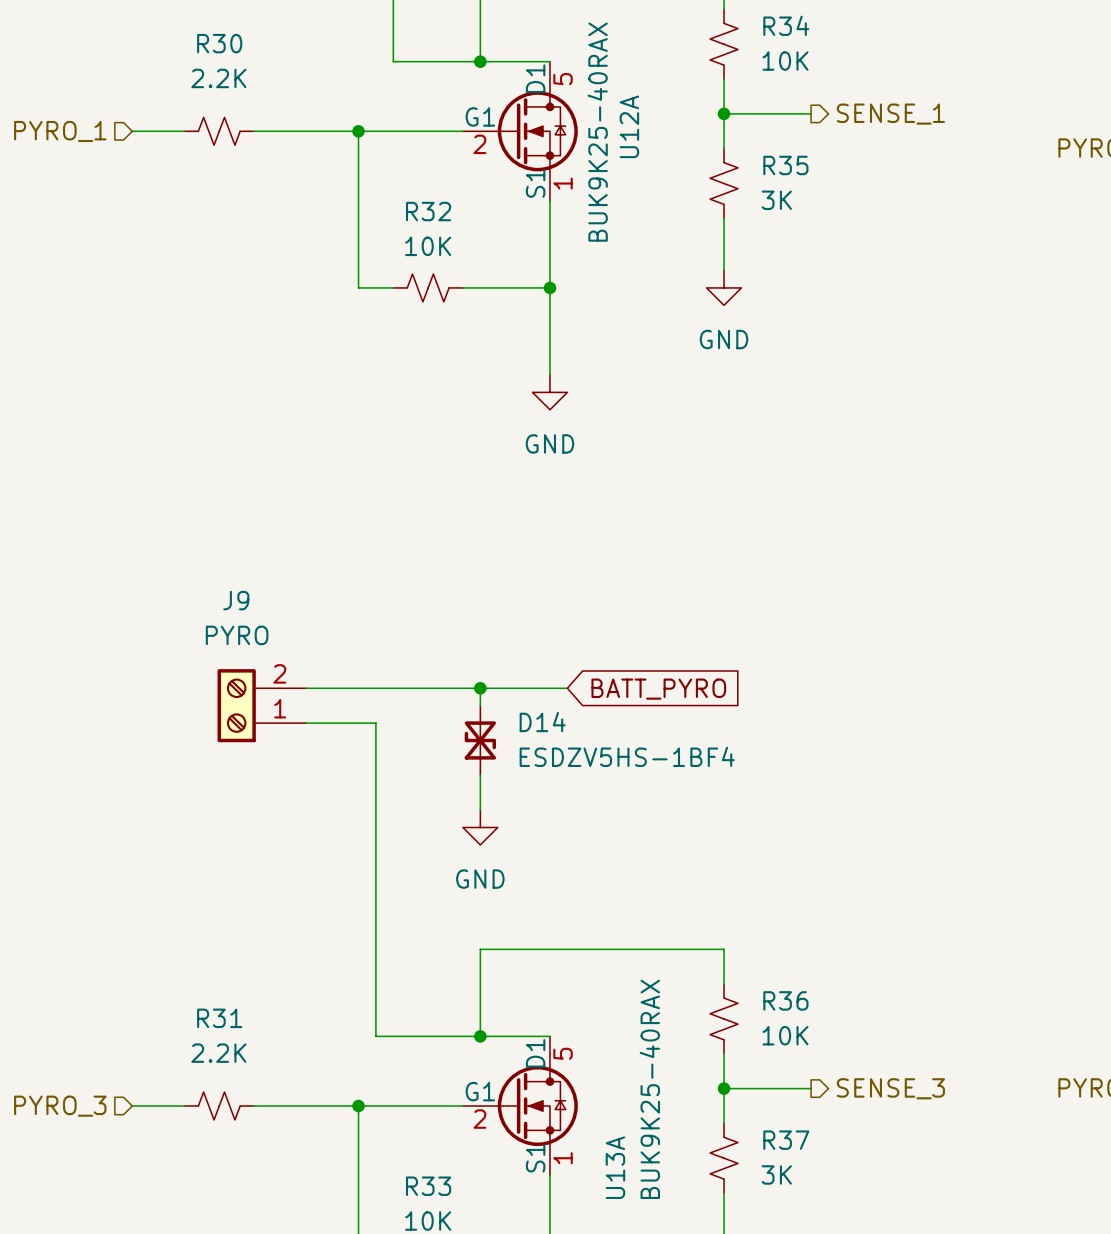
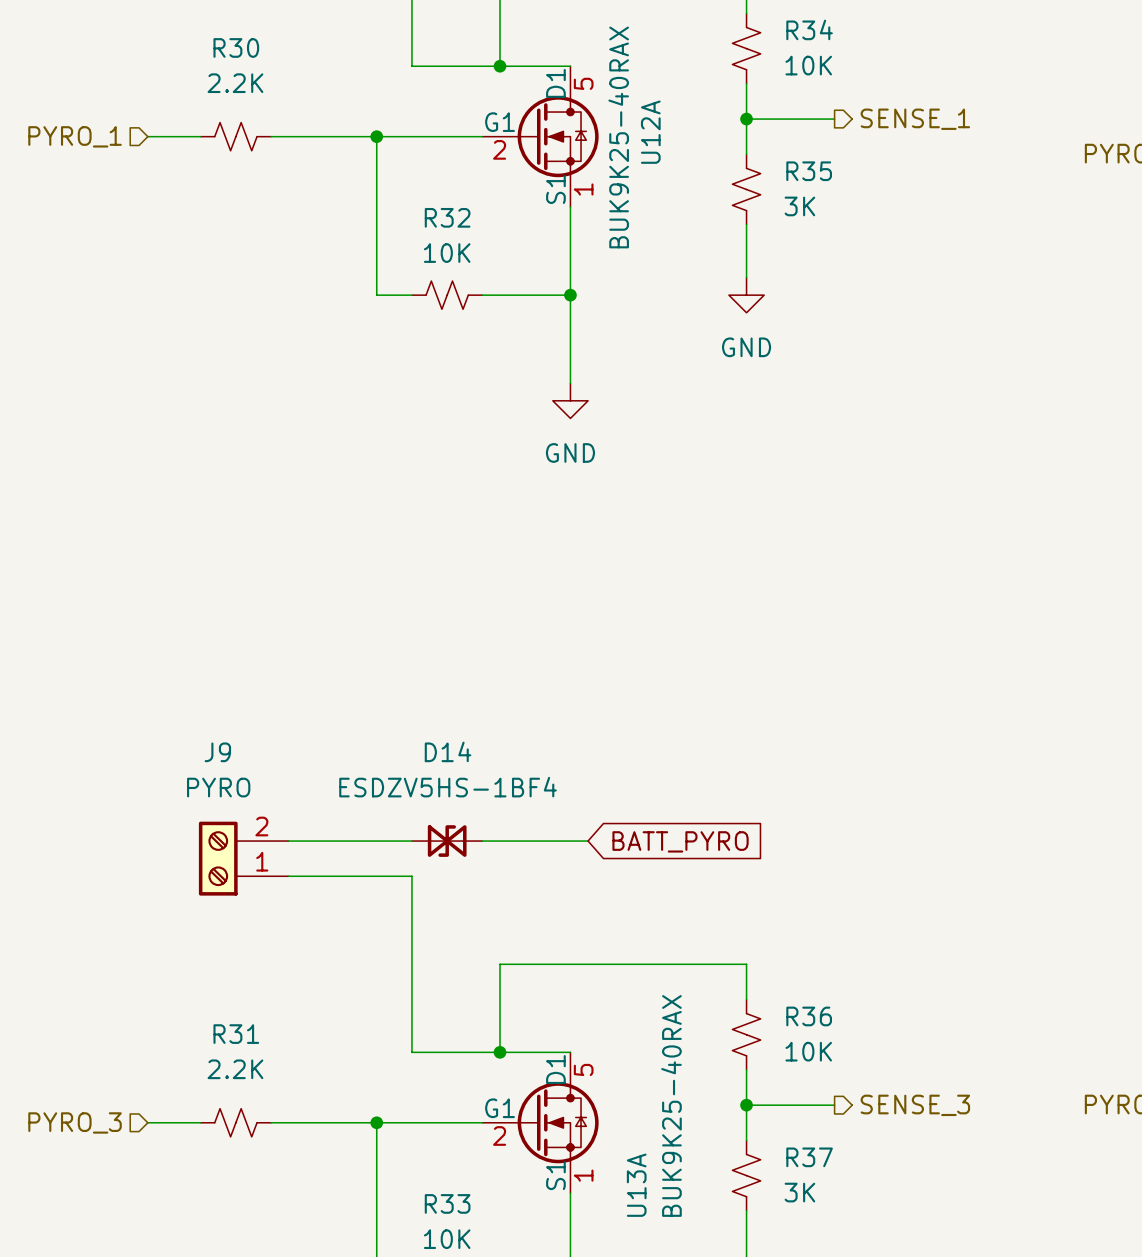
wire: (306, 688) (567, 688) -> none
wire: (480, 688) (480, 705) -> none
junction: (480, 688) -> none
global label position: BATT_PYRO (658, 689) -> BATT_PYRO (680, 841)
J9 position: (261, 705) -> (243, 858)
D14 name position: D14 (542, 722) -> D14 (448, 751)
wire: (306, 723) (375, 723) (375, 1036) (393, 1036) -> (288, 876) (411, 876) (411, 1052)
D14 rotation: 0° (480, 740) -> 90° clockwise (447, 841)
D14 position: (480, 740) -> (447, 841)
D14 value position: ESDZV5HS-1BF4 (627, 756) -> ESDZV5HS-1BF4 (448, 787)
wire: (480, 775) (480, 810) -> none
wire: none -> (288, 841) (411, 841)
wire: none -> (482, 841) (588, 841)
power symbol: GND (480, 827) -> none

